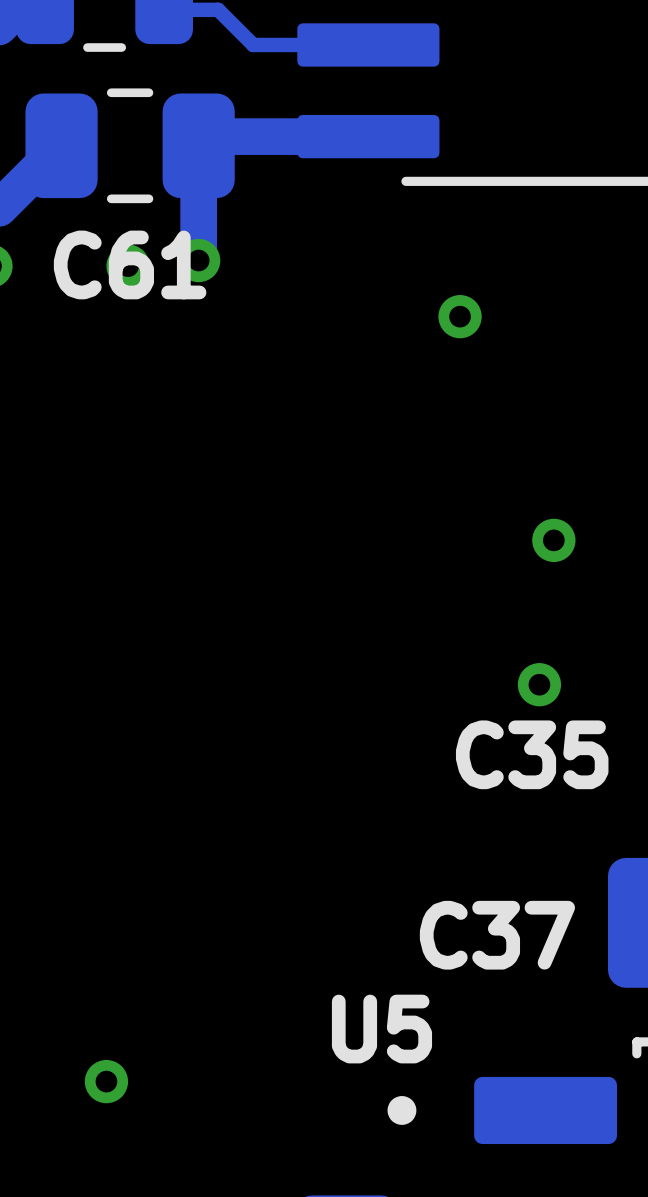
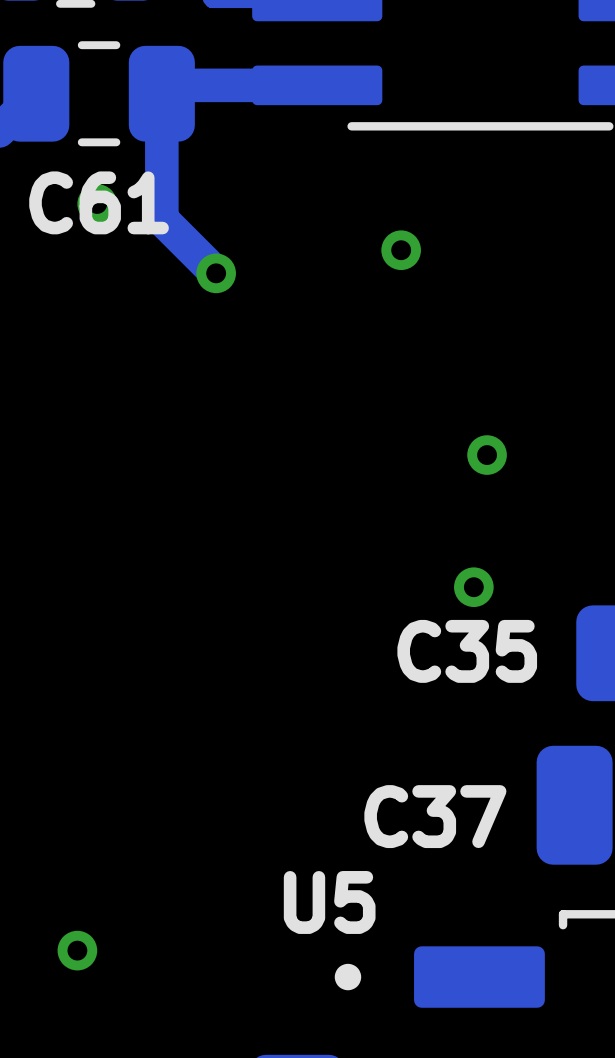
track: none -> (161, 198) (161, 219) (216, 273)
via position: (198, 260) -> (216, 273)

